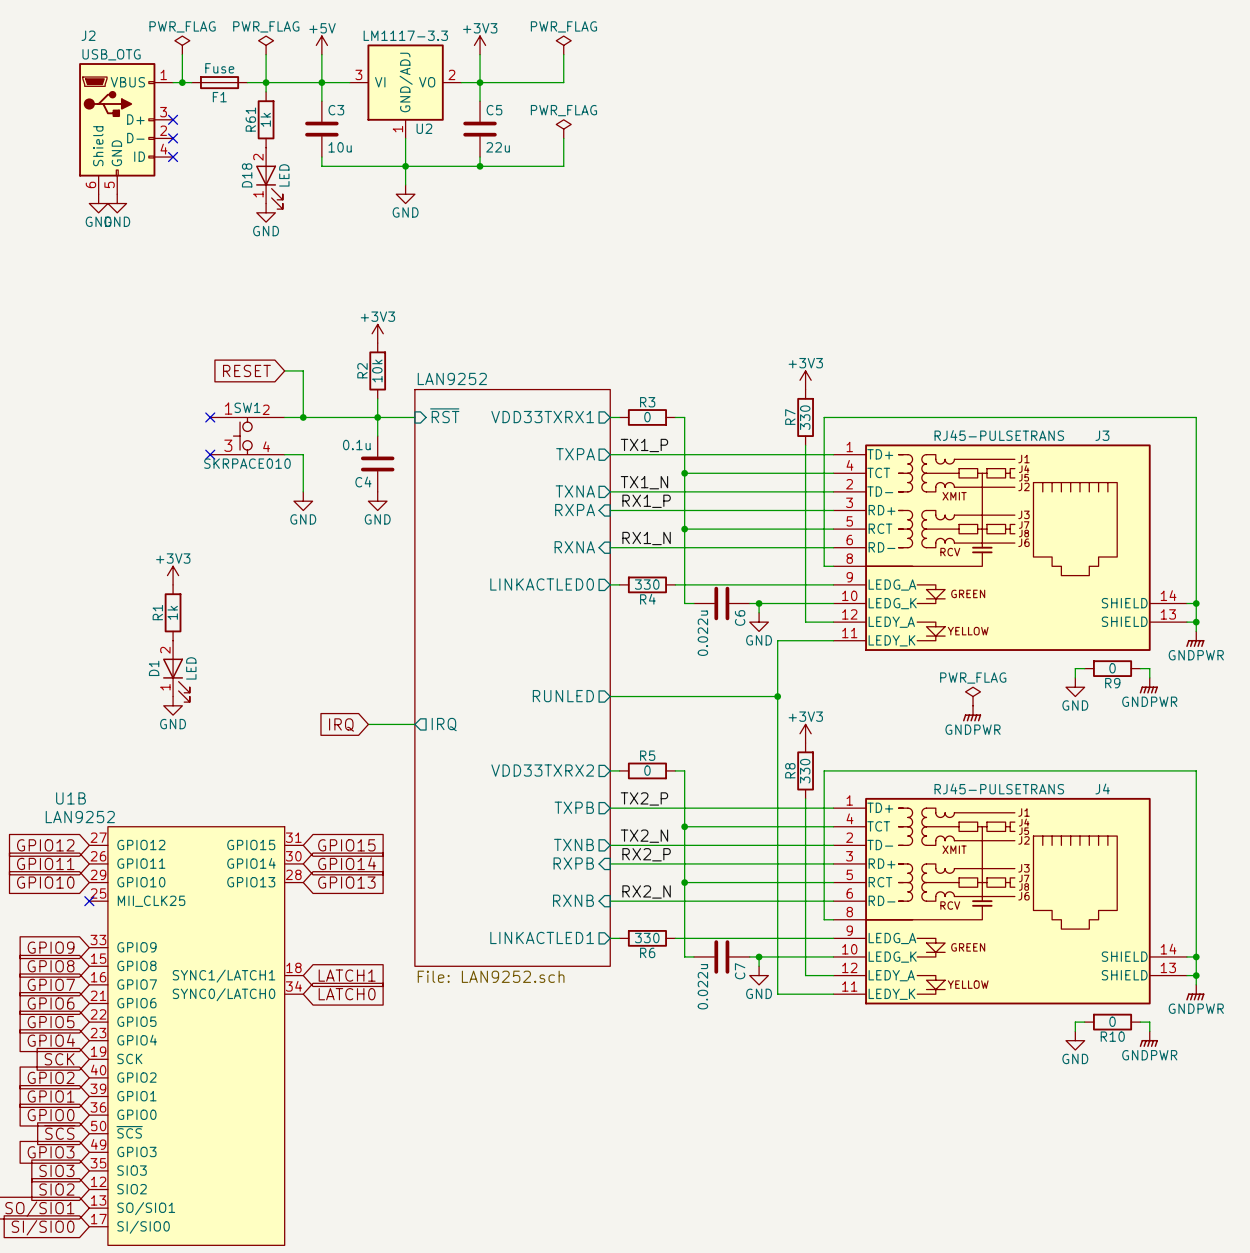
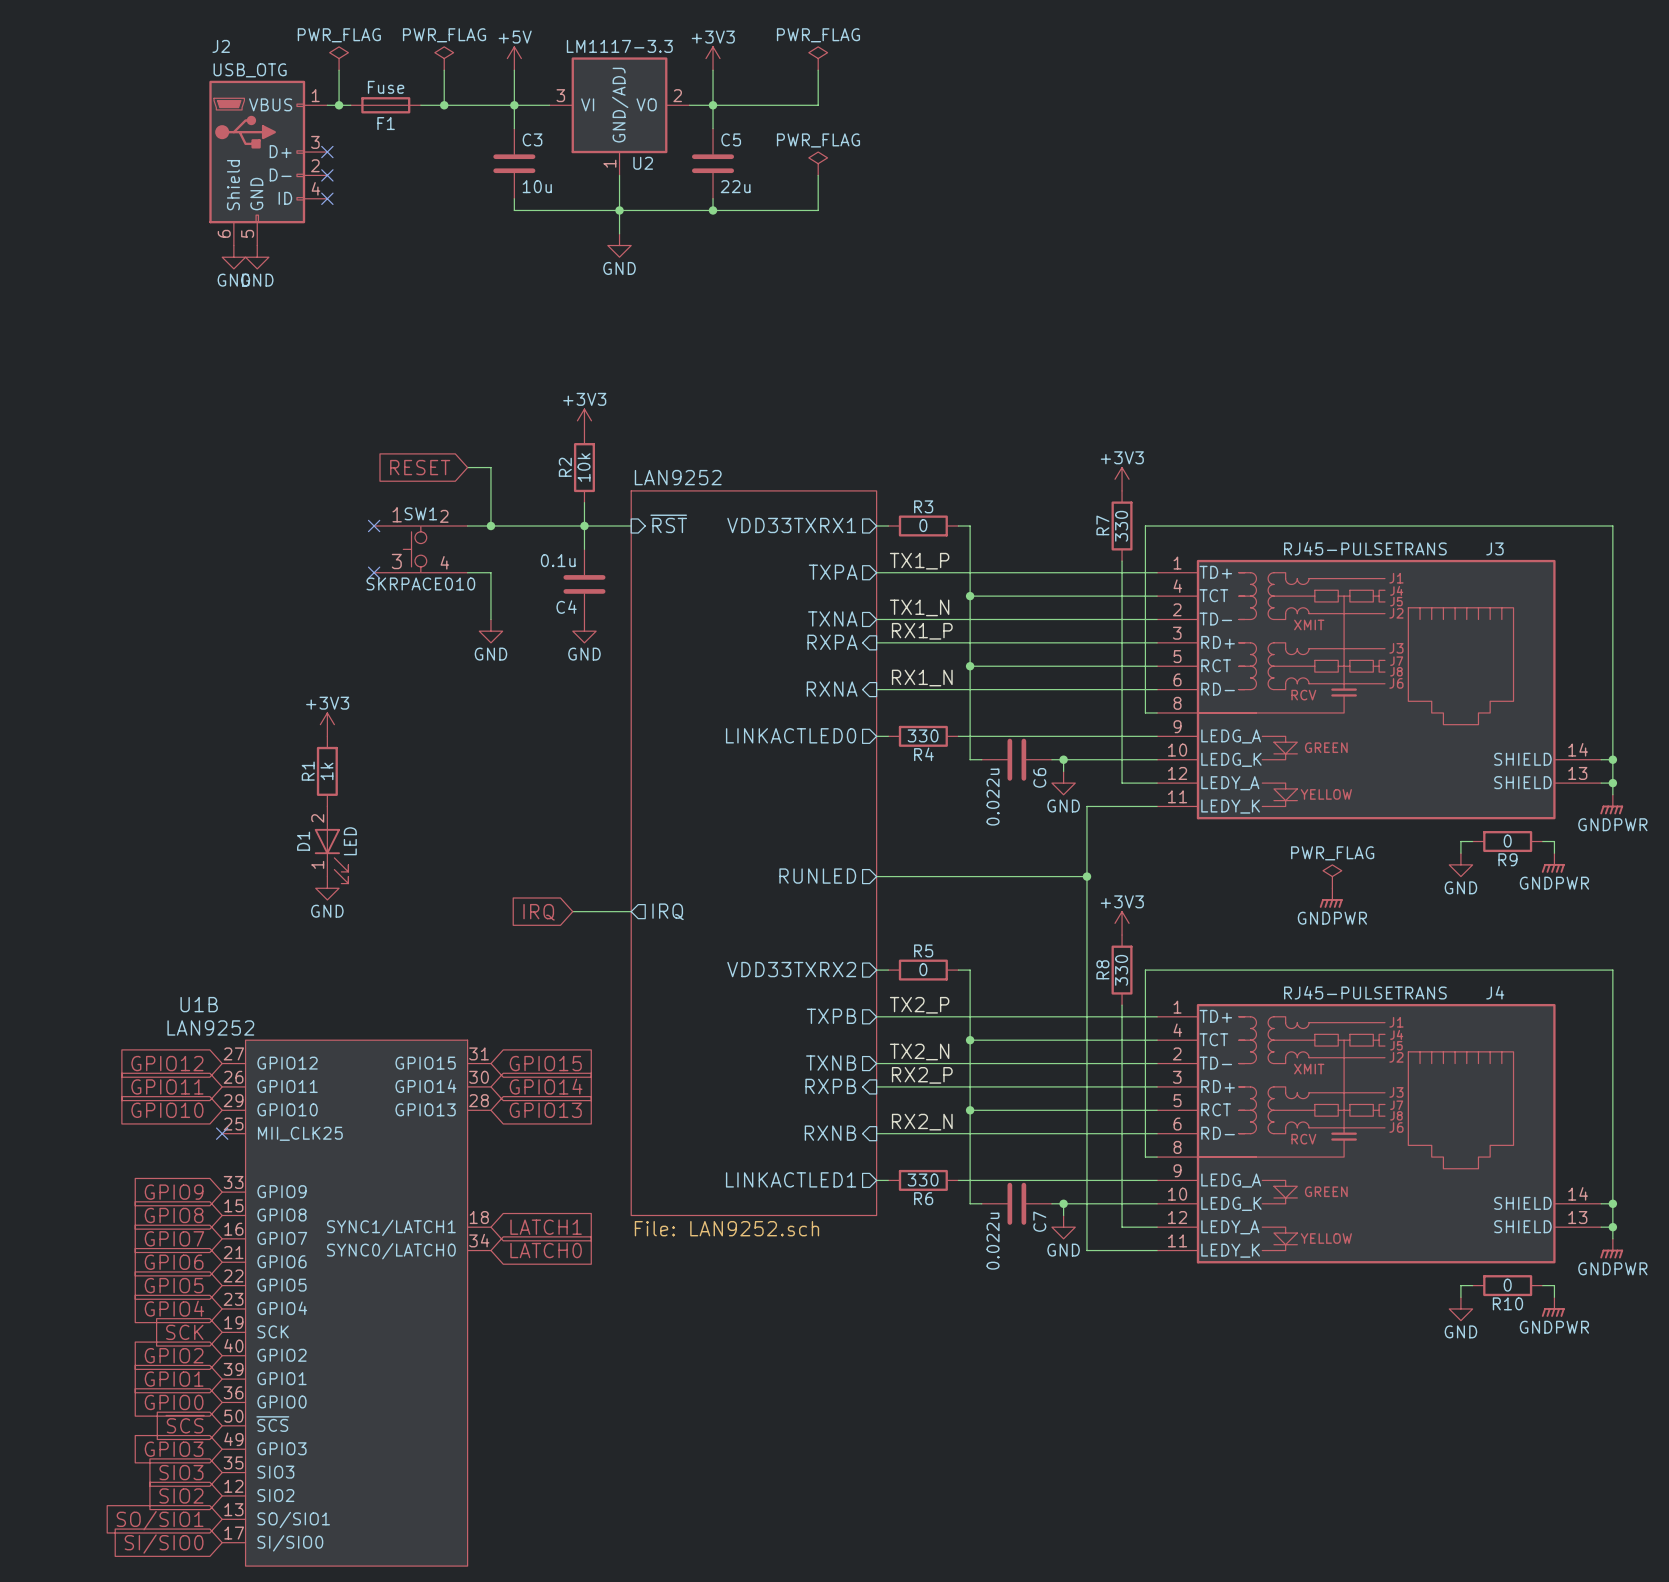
wire: (266, 82) (266, 91) -> none
R61: 1k (266, 119) -> none
D18: LED (269, 178) -> none
power symbol: GND (266, 212) -> none

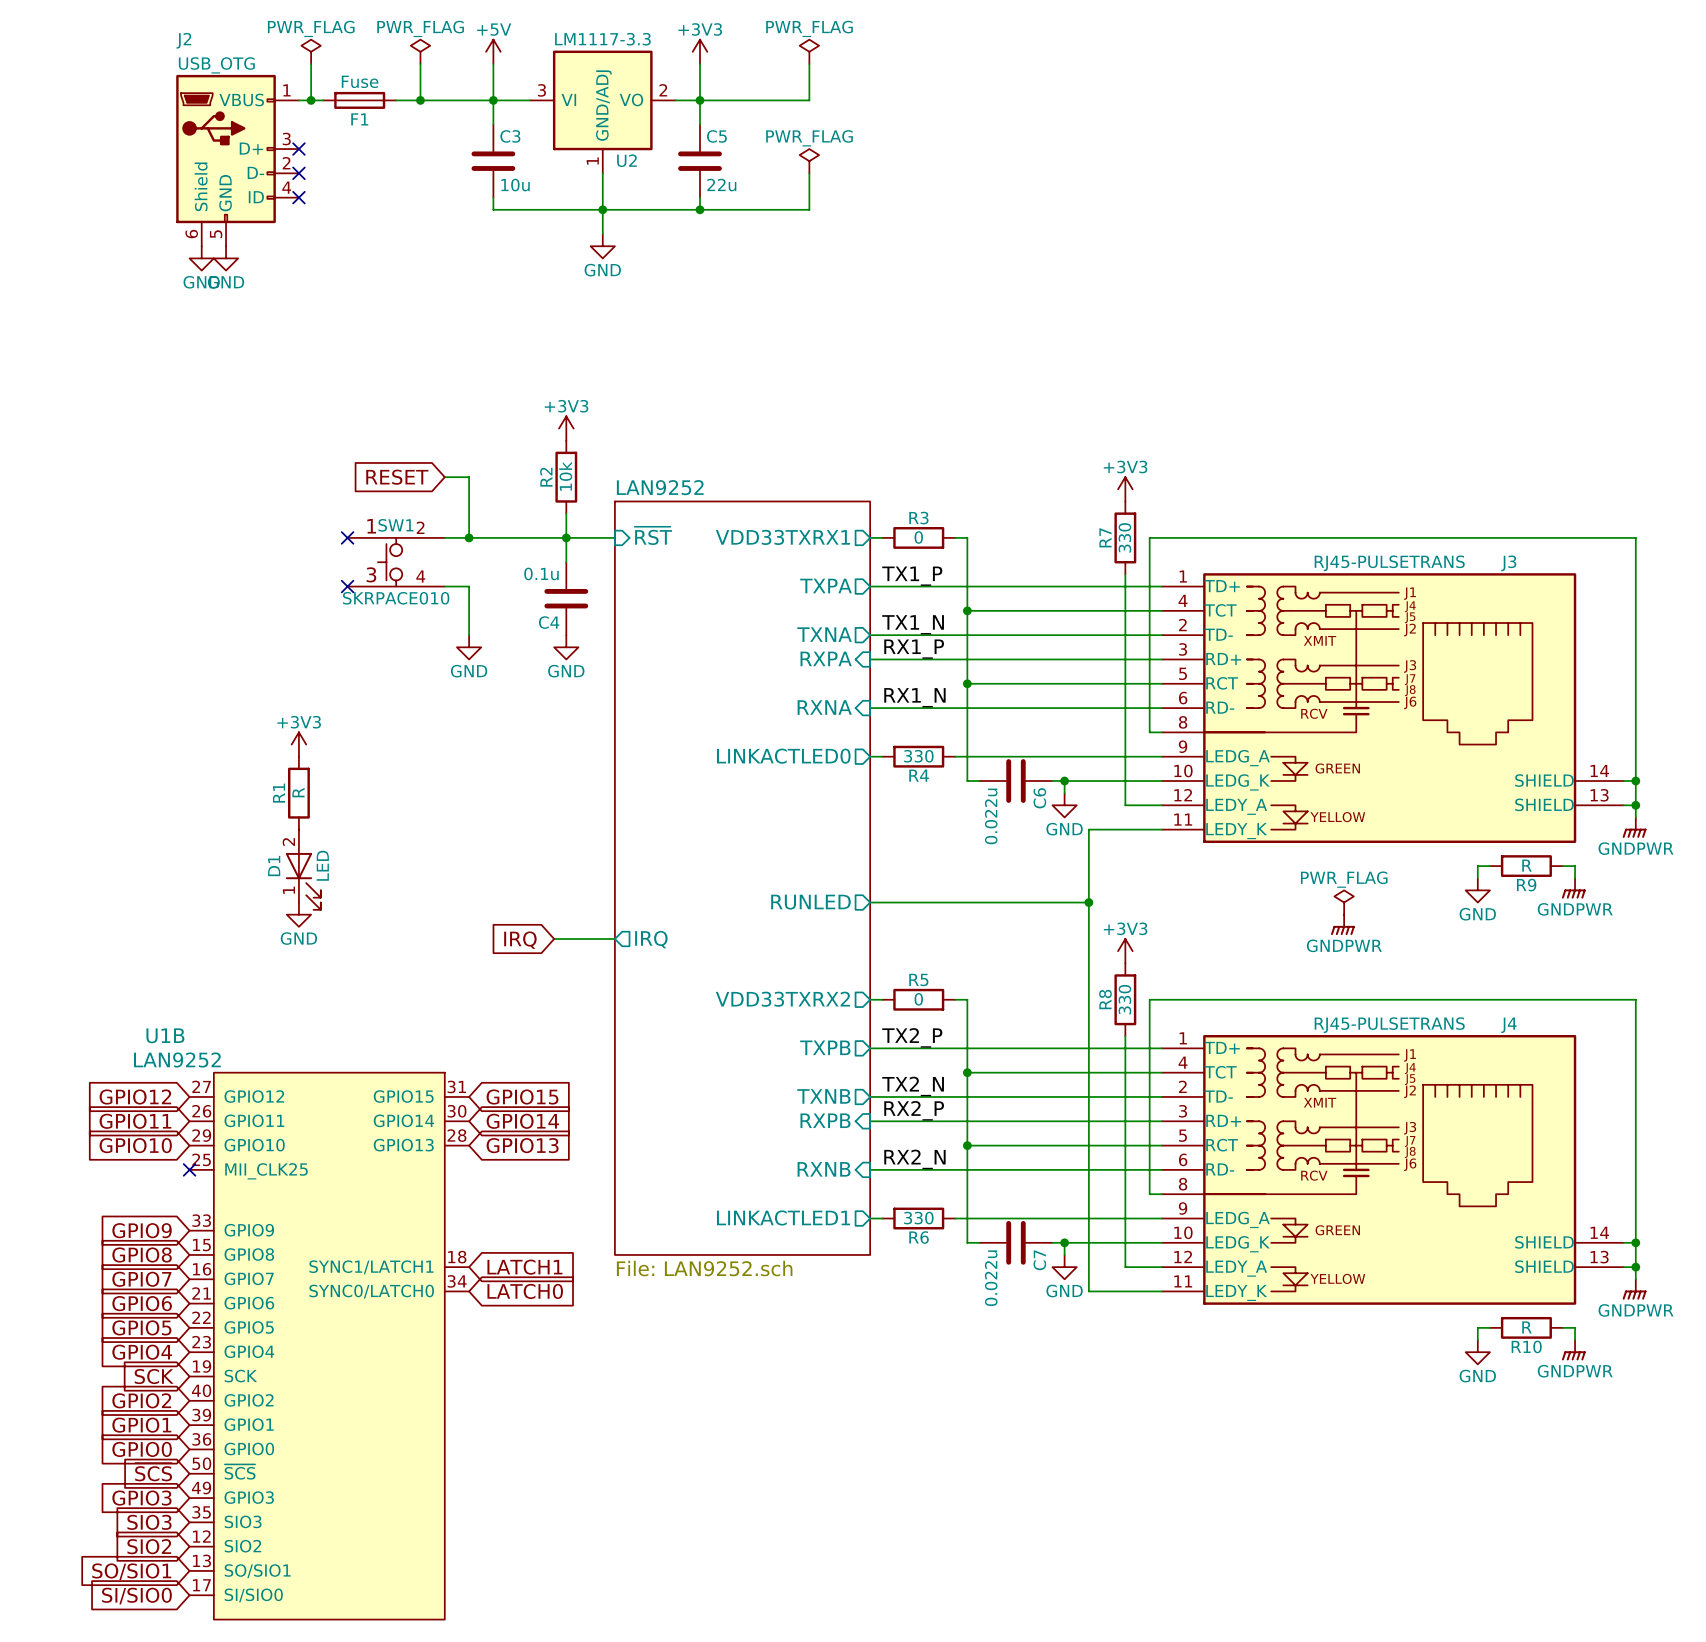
R1 value: 1k (326, 771) -> R (298, 792)
R9 value: 0 (1507, 841) -> R (1526, 865)
R10 value: 0 (1507, 1285) -> R (1526, 1327)

